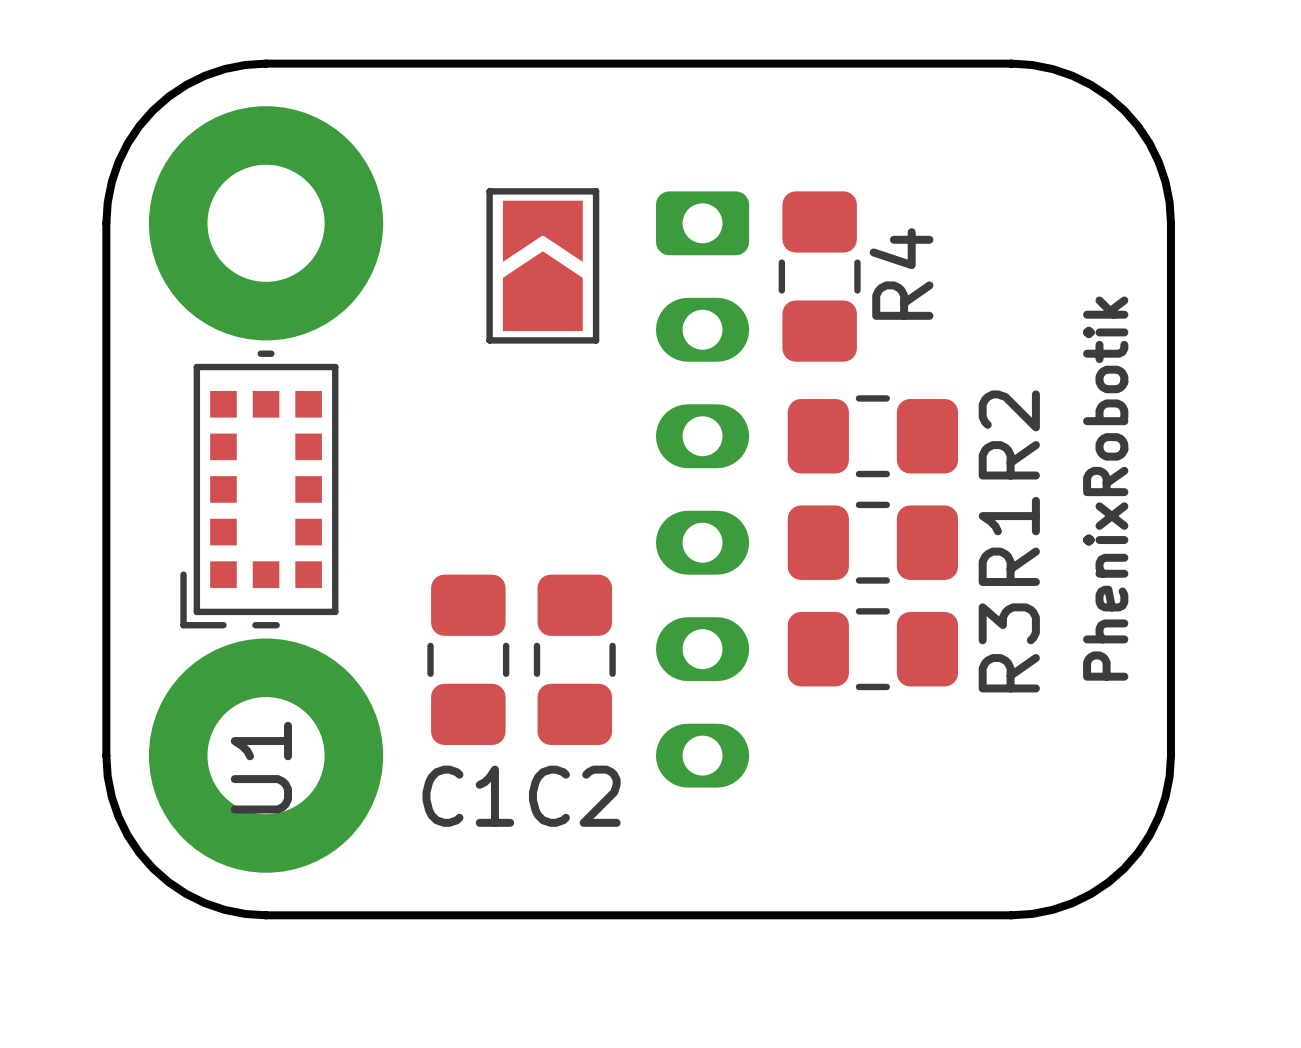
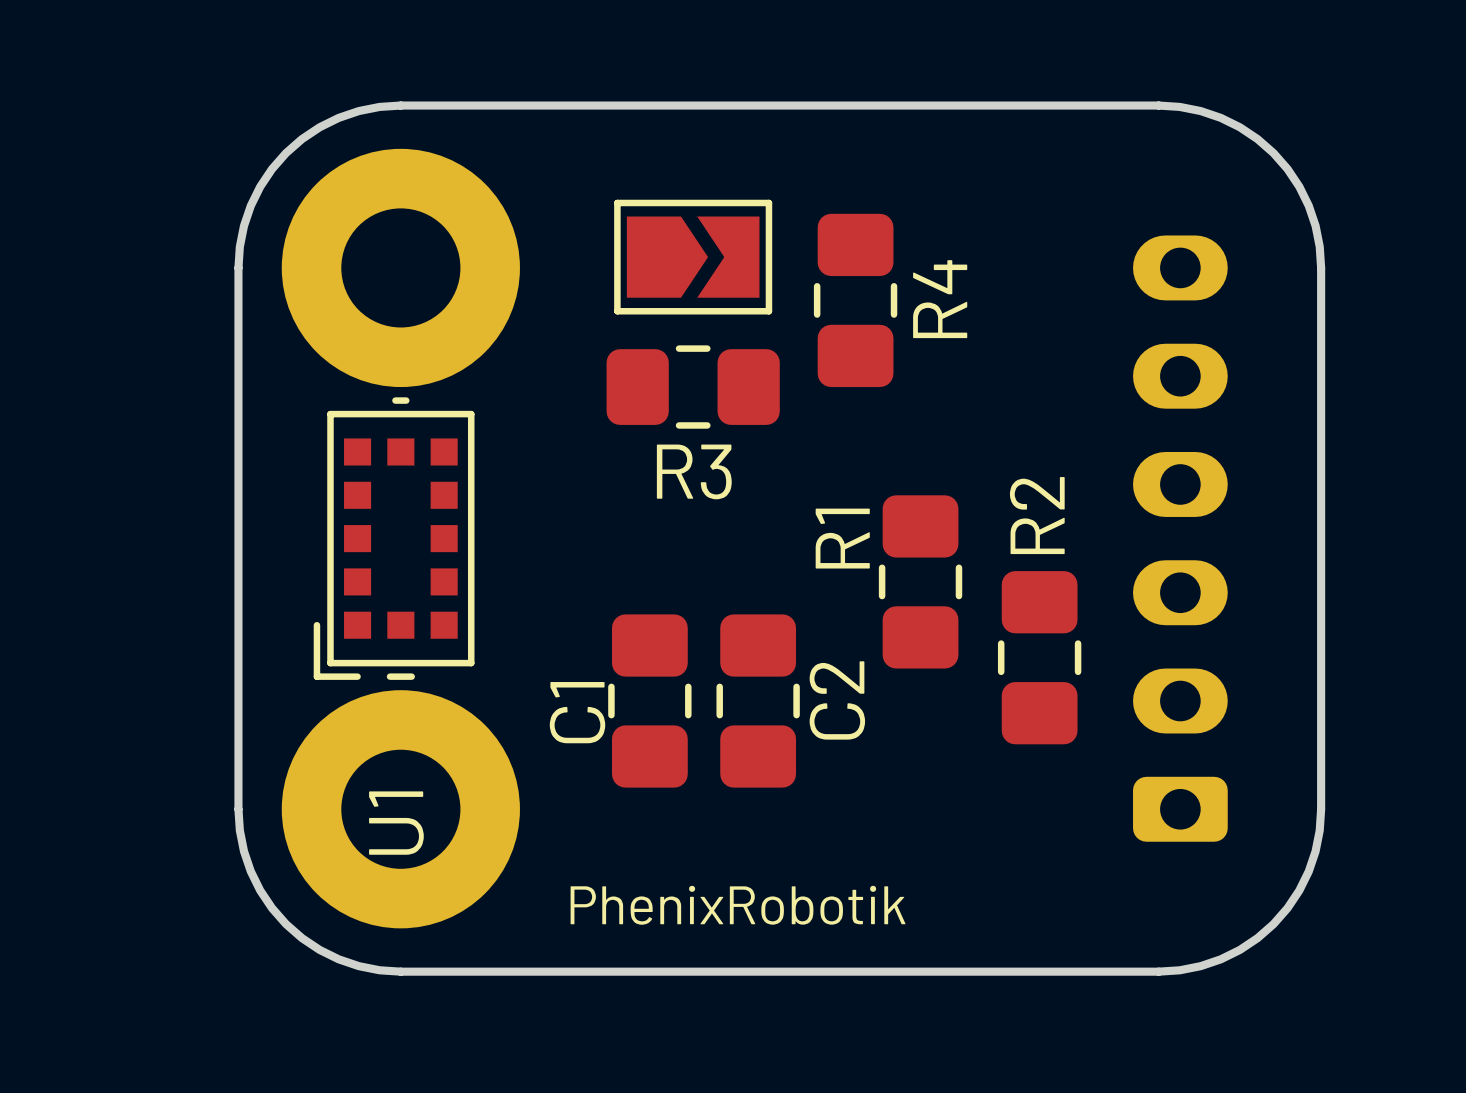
part rotation: 0° (542, 265) -> 90° clockwise (693, 257)
R4 position: (819, 276) -> (855, 300)
R2 name position: R2 (1009, 434) -> R2 (1037, 515)
R2 rotation: 0° (872, 436) -> 90° clockwise (1039, 657)
R2 position: (872, 436) -> (1039, 657)
text rotation: 0° (1105, 488) -> 90° clockwise (738, 905)
text position: PhenixRobotik (1105, 488) -> PhenixRobotik (738, 905)
part rotation: 0° (702, 489) -> 180° (1180, 538)
R1 name position: R1 (1009, 541) -> R1 (842, 538)
R1 rotation: 0° (872, 542) -> 90° clockwise (920, 581)
R3 name rotation: 0° (1009, 647) -> 90° clockwise (694, 471)
R3 name position: R3 (1009, 647) -> R3 (694, 471)
R3 position: (872, 649) -> (693, 387)
C1 position: (468, 659) -> (649, 701)
C2 position: (574, 659) -> (758, 701)
C1 name rotation: 0° (468, 796) -> 90° counterclockwise (577, 712)
C1 name position: C1 (468, 796) -> C1 (577, 712)
C2 name rotation: 0° (574, 796) -> 90° counterclockwise (837, 700)
C2 name position: C2 (574, 796) -> C2 (837, 700)

